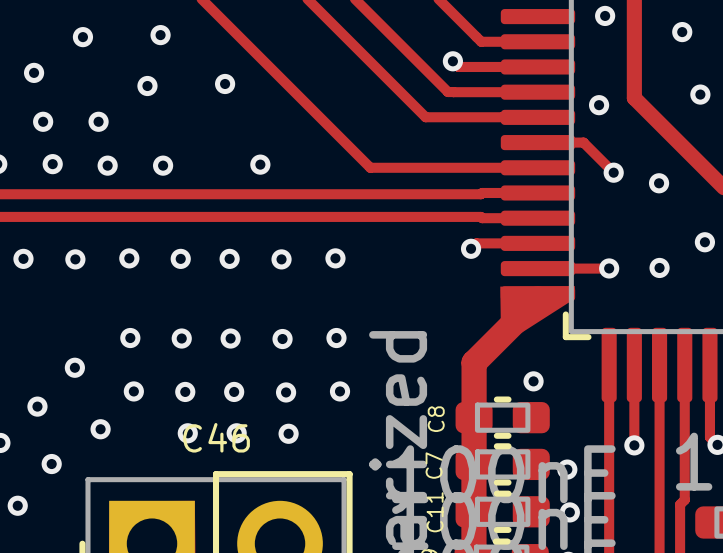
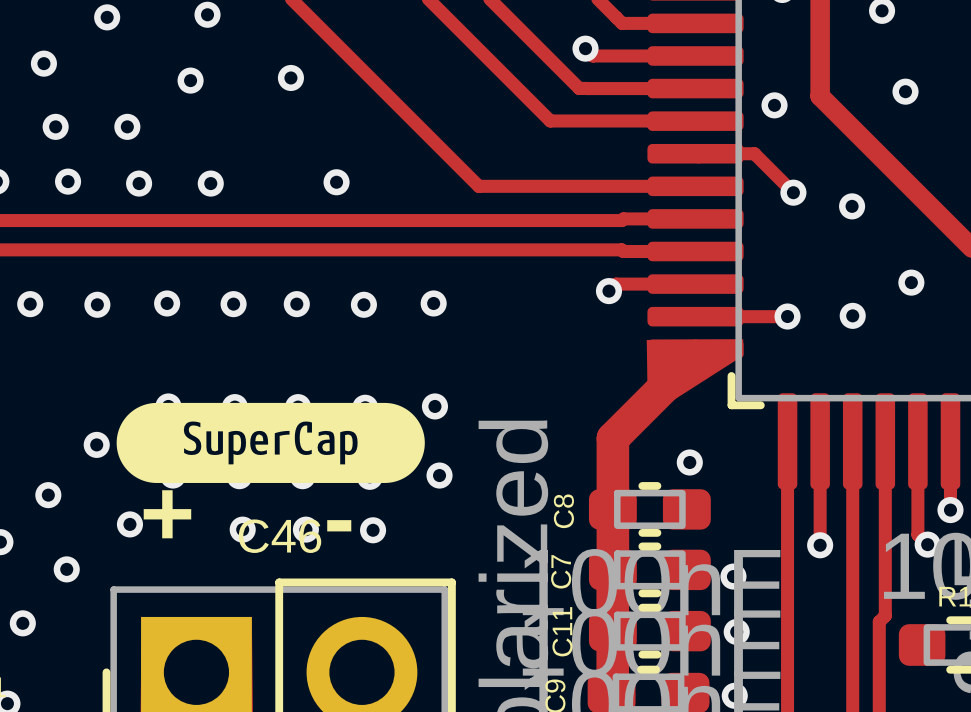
drawing: none -> [116, 402, 425, 483]
text: none -> + (167, 514)
text: none -> - (339, 525)

